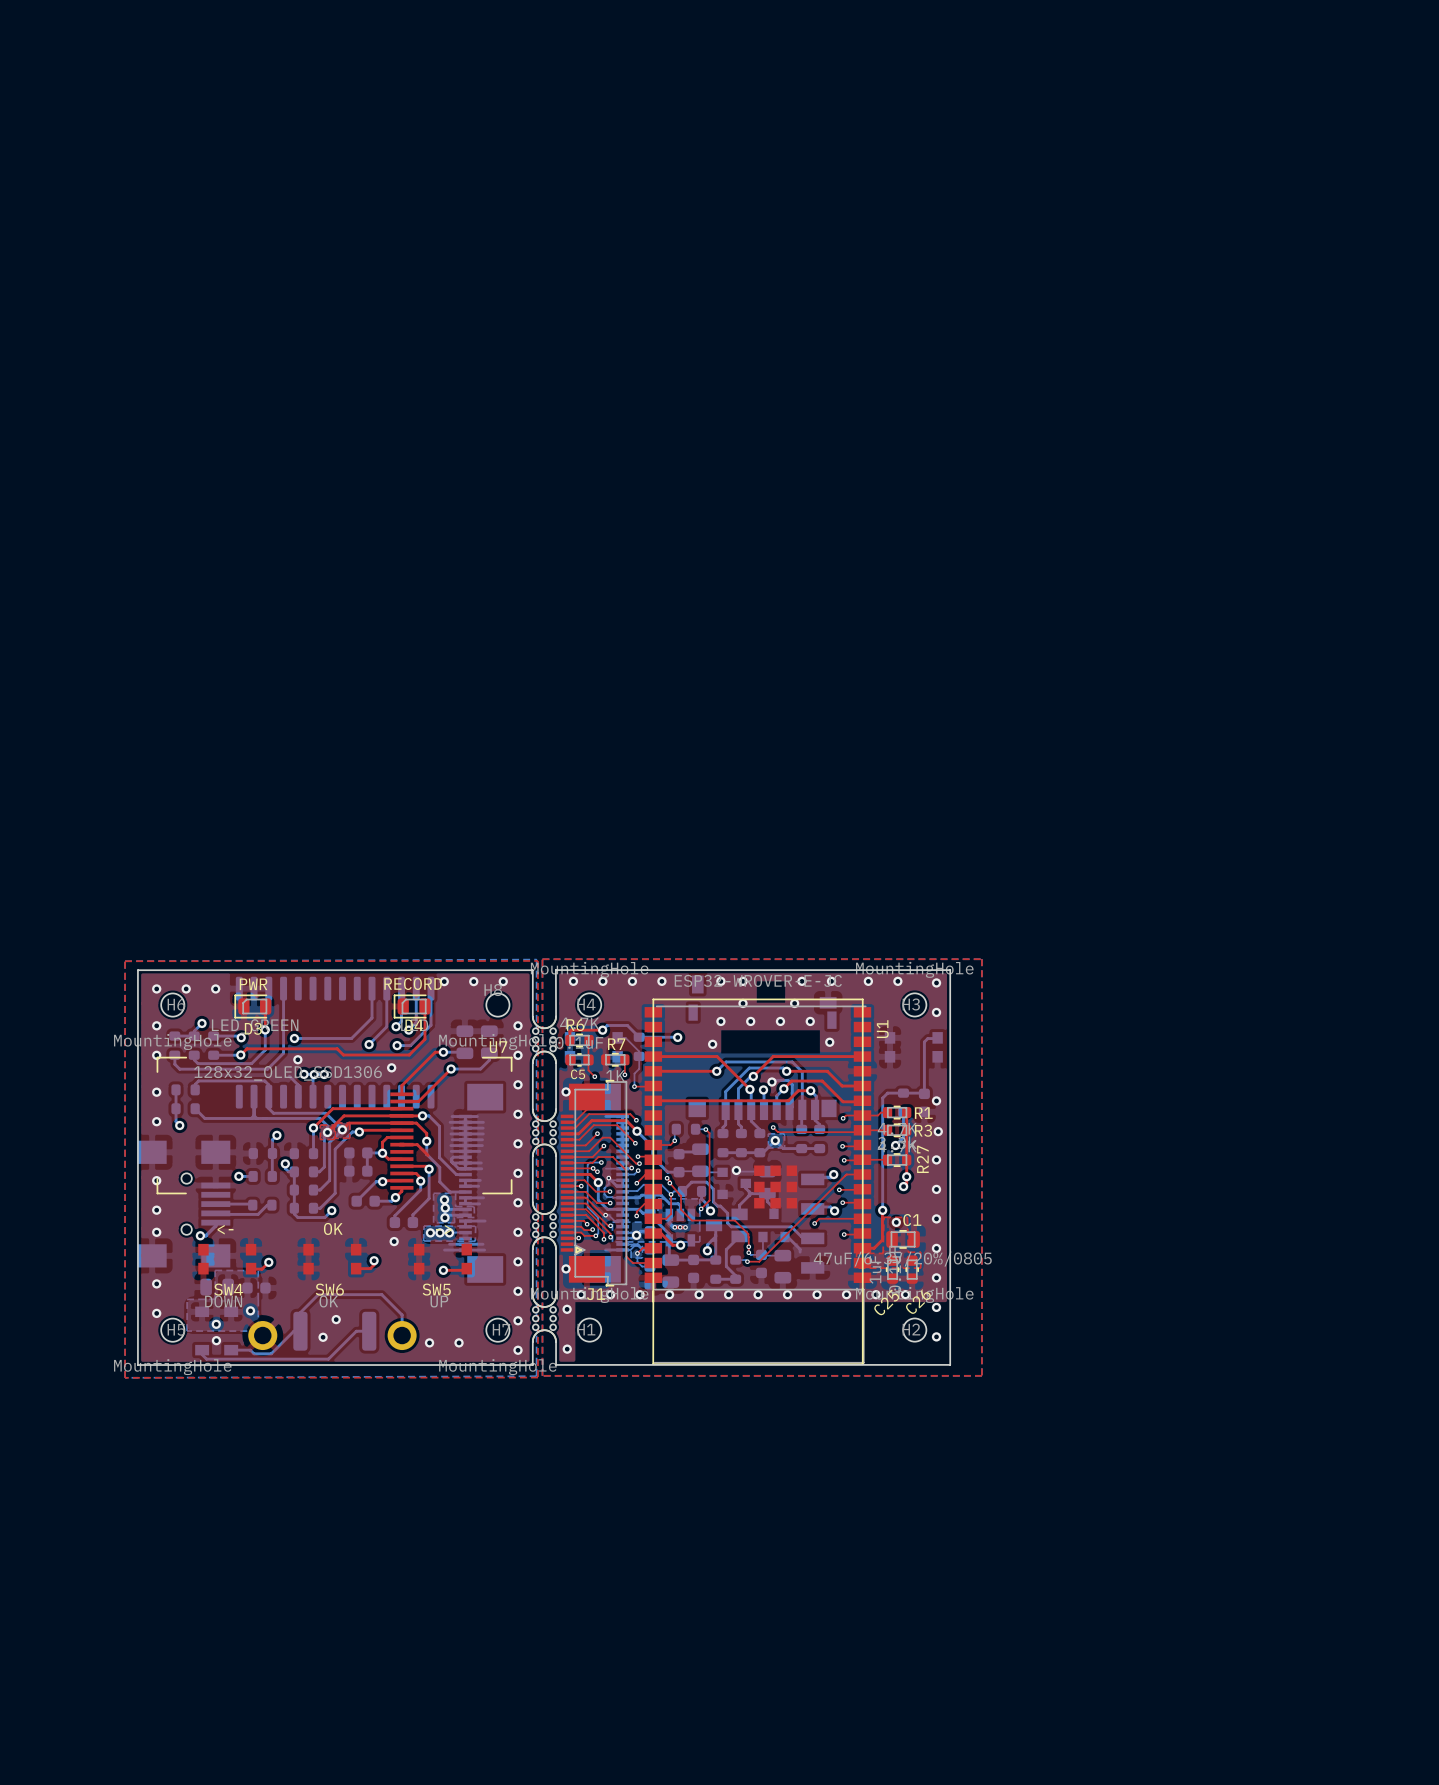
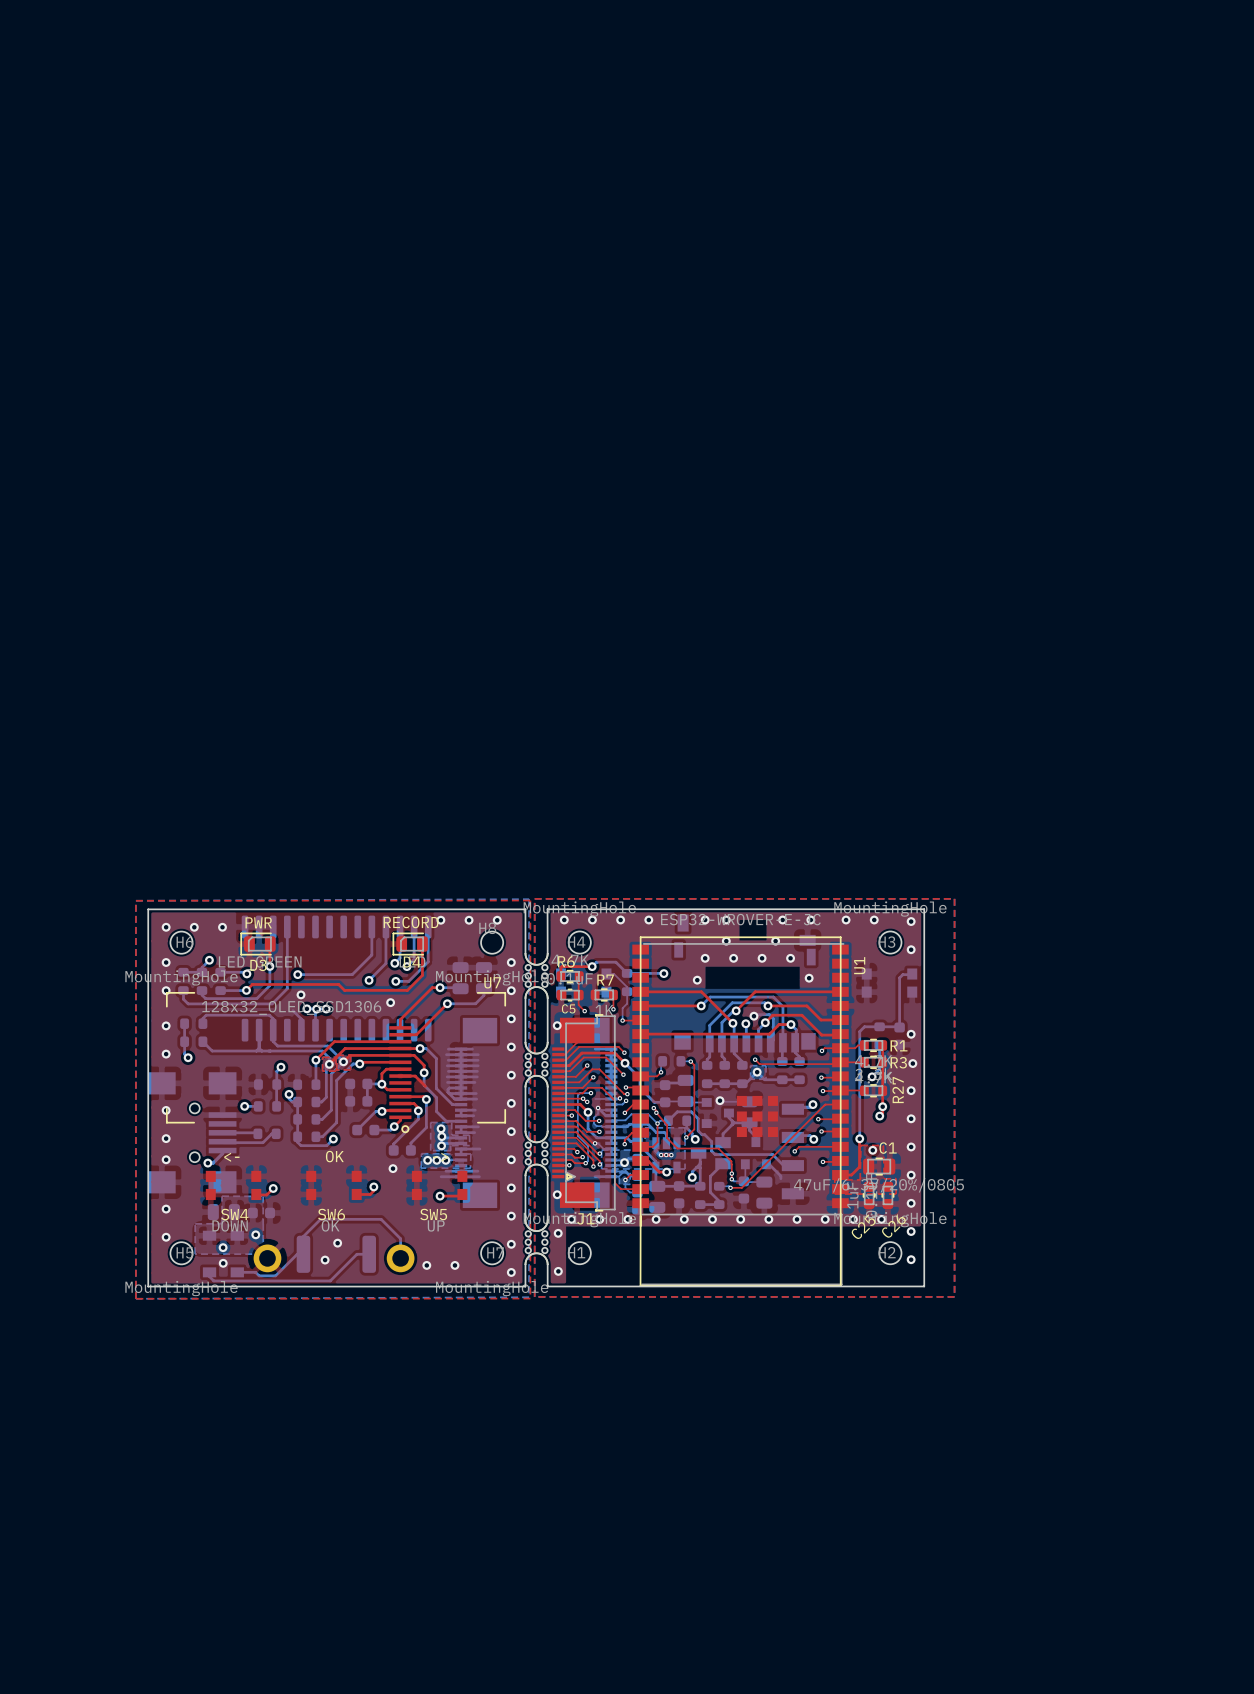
drawing: none -> [401, 1125, 410, 1133]

